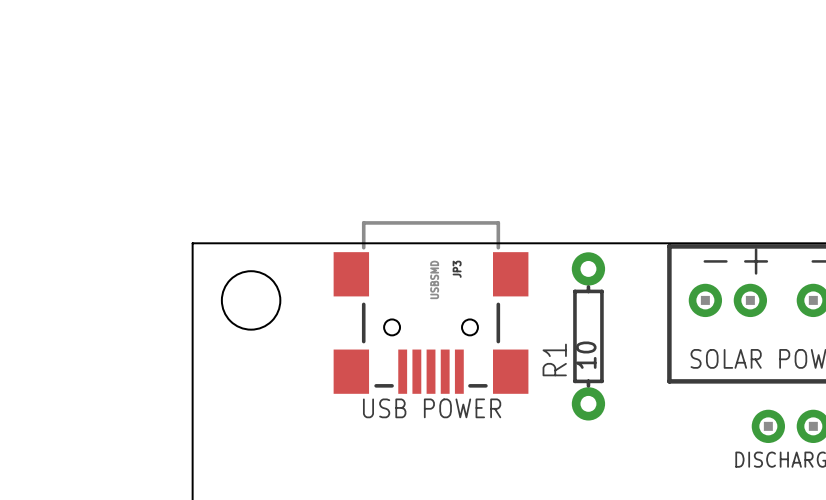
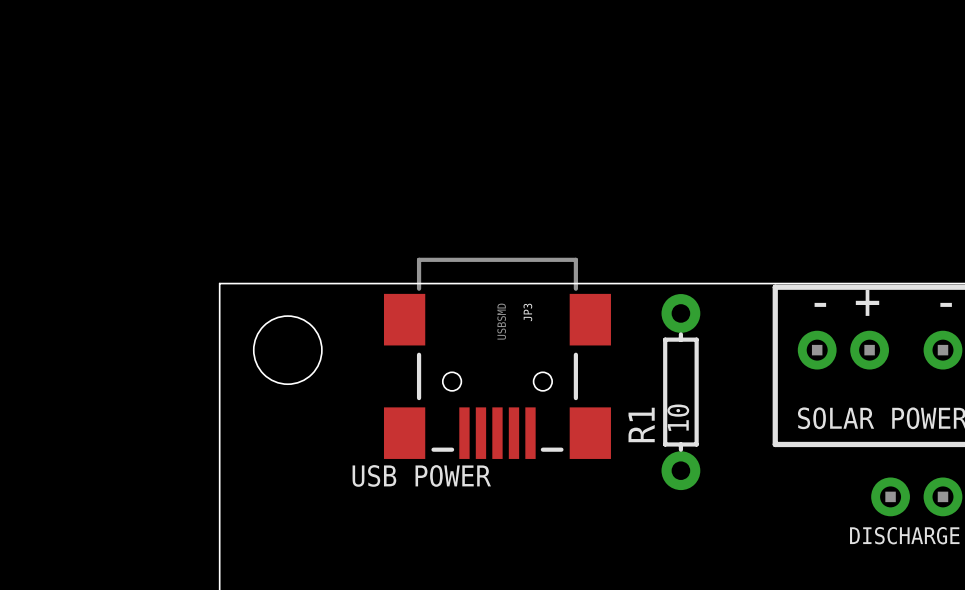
text position: USB POWER (432, 408) -> USB POWER (421, 475)

